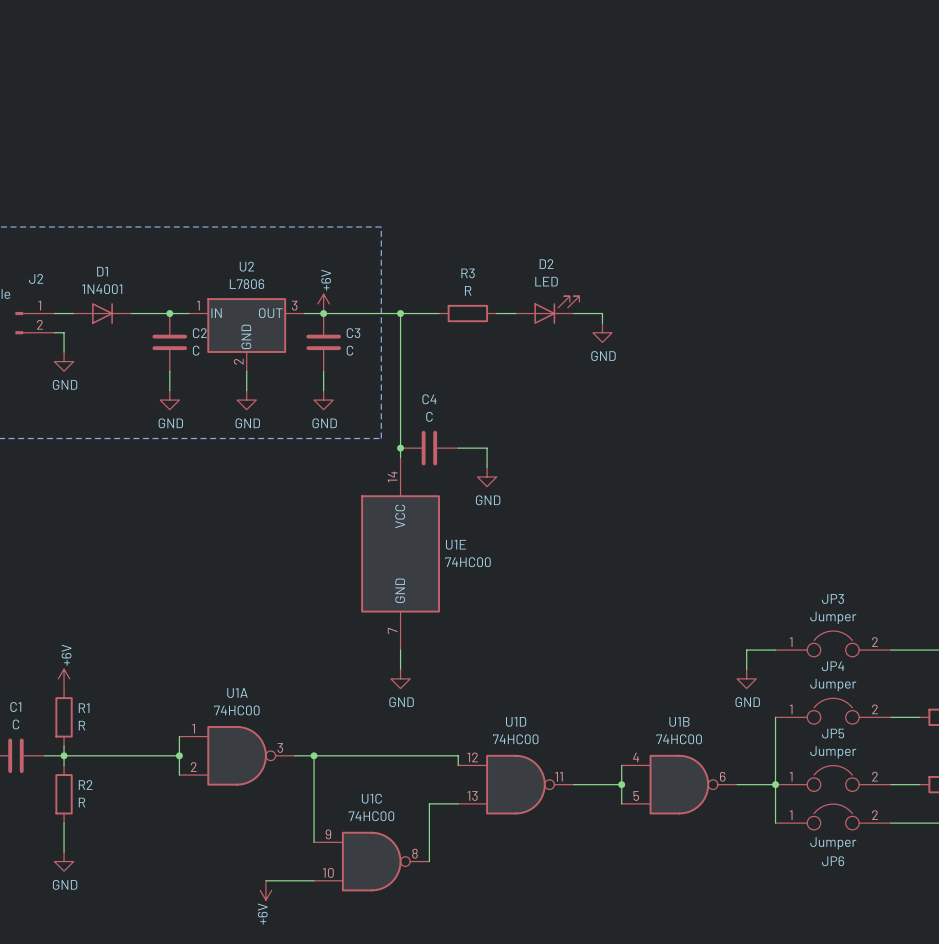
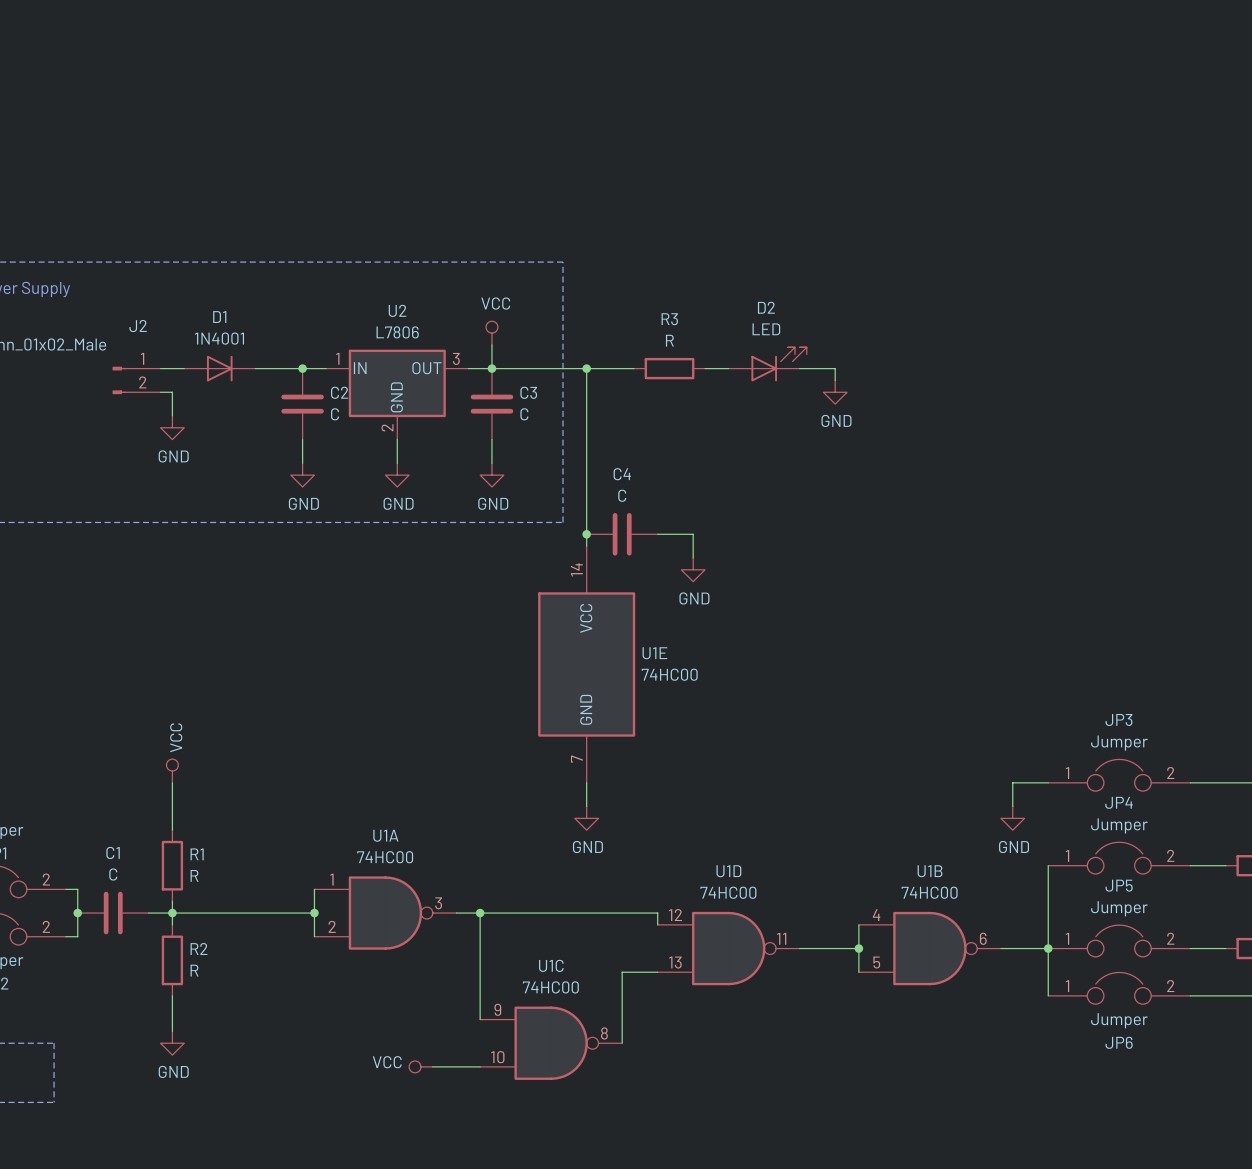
power symbol: none -> VCC (491, 333)
power symbol: +6V (323, 303) -> none
power symbol: none -> VCC (172, 771)
power symbol: +6V (64, 678) -> none
power symbol: none -> VCC (420, 1066)
power symbol: +6V (265, 890) -> none

